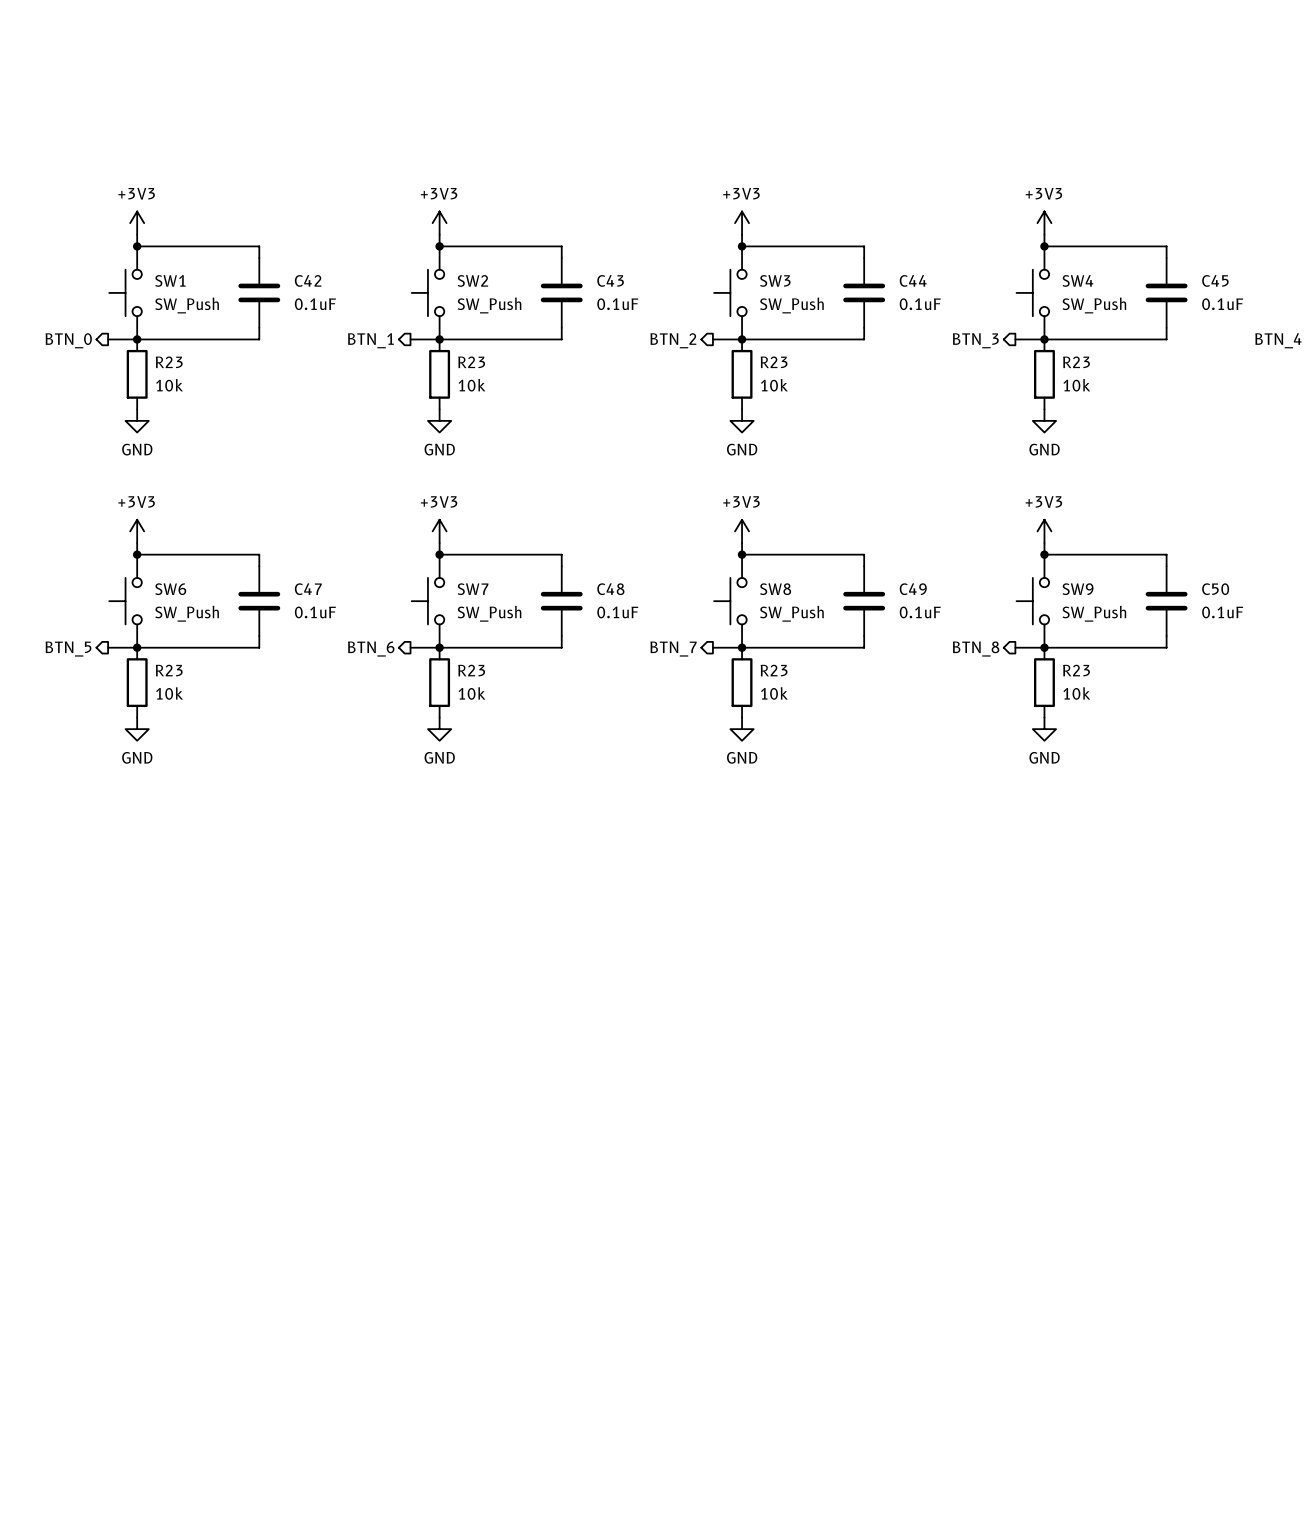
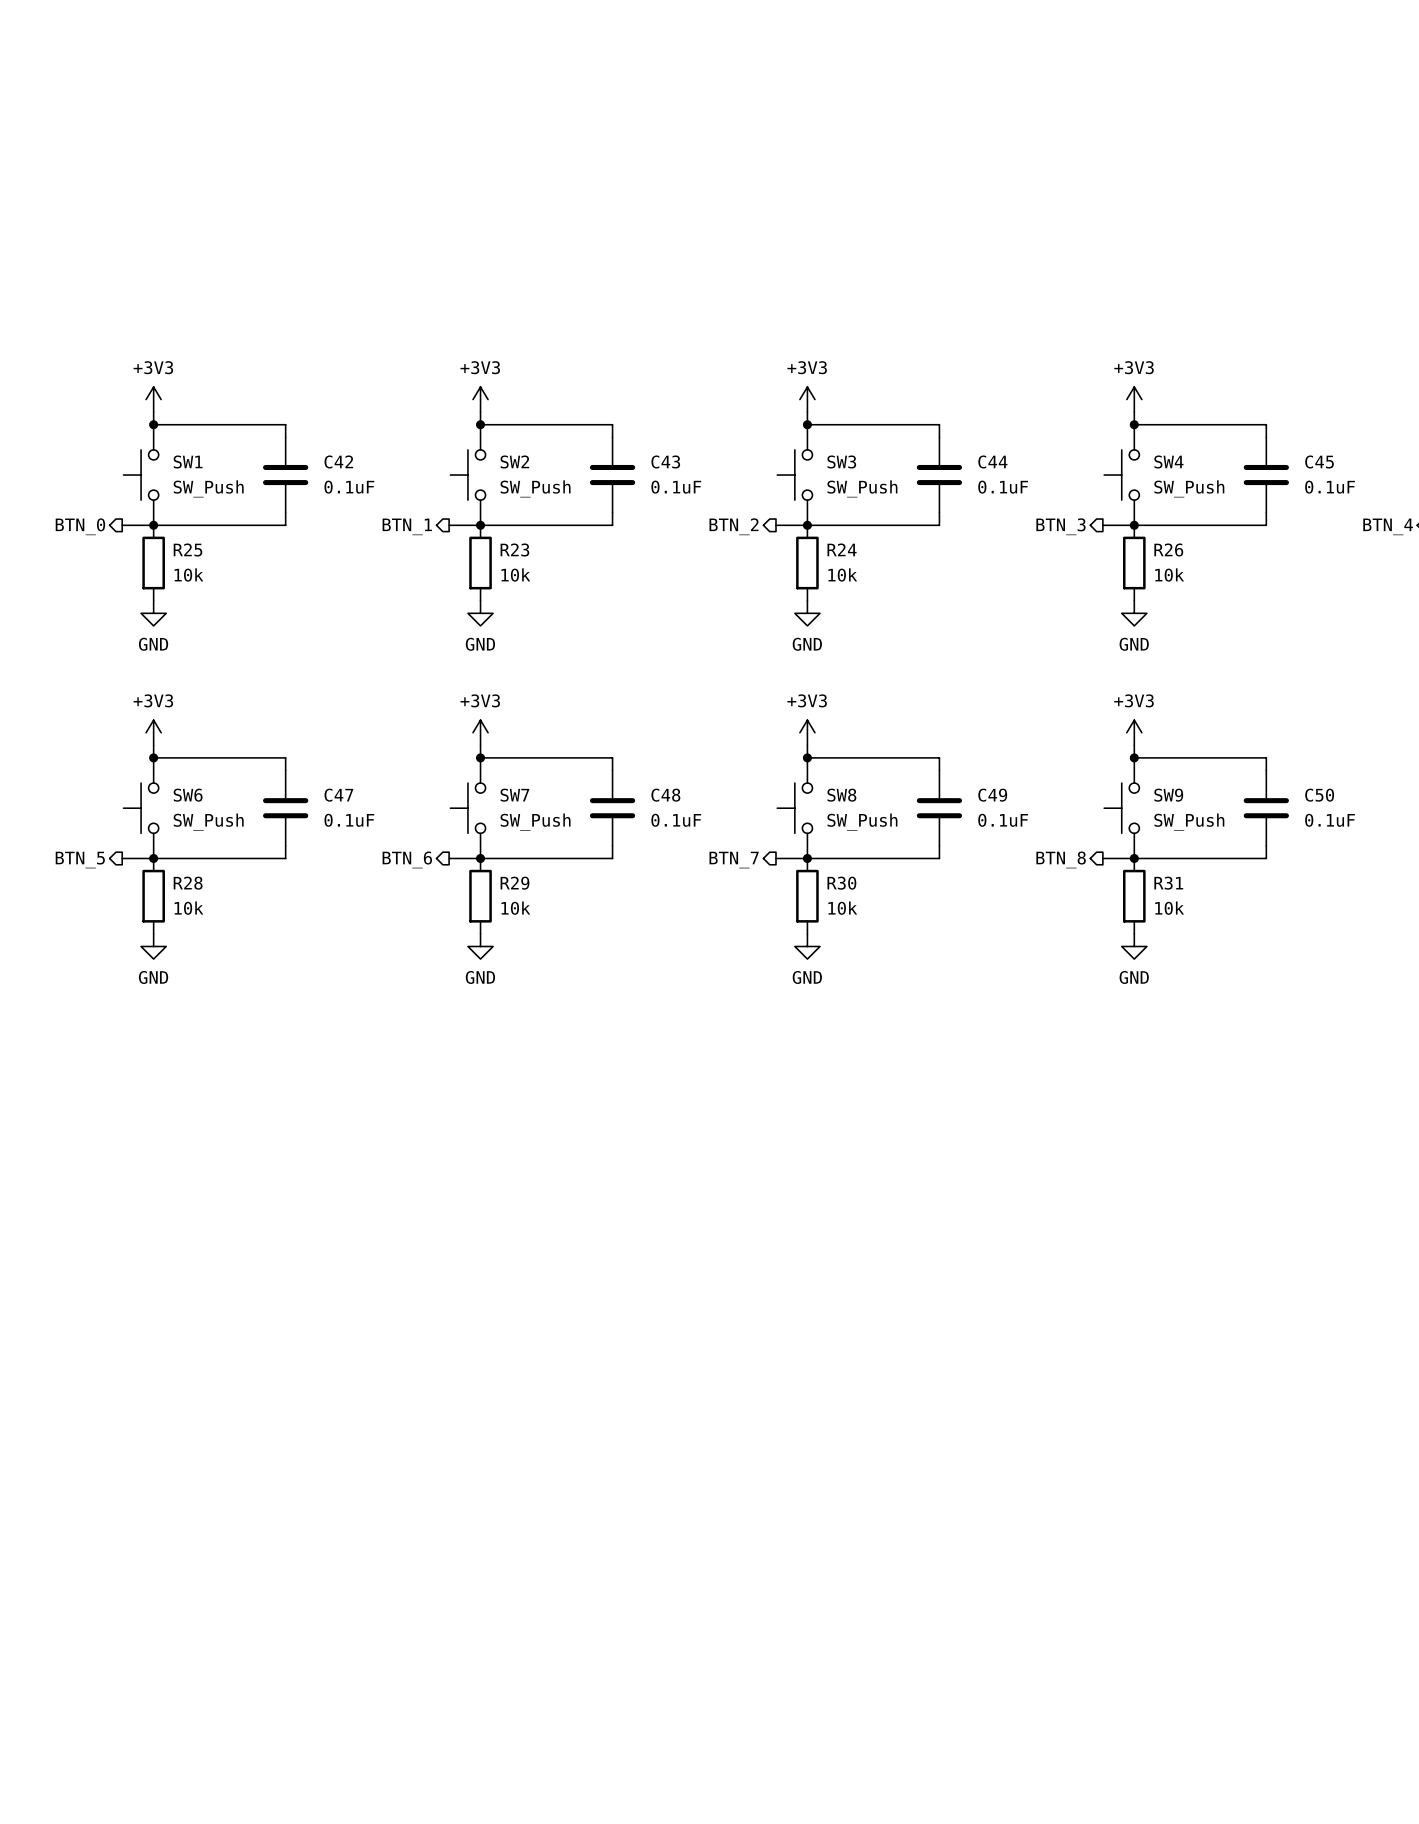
R23 name: R23 (169, 362) -> R25 (187, 549)
R23 name: R23 (774, 362) -> R24 (842, 549)
R23 name: R23 (1076, 362) -> R26 (1168, 549)
R23 name: R23 (169, 670) -> R28 (188, 883)
R23 name: R23 (471, 670) -> R29 (514, 883)
R23 name: R23 (774, 670) -> R30 (841, 883)
R23 name: R23 (1076, 670) -> R31 (1168, 883)

